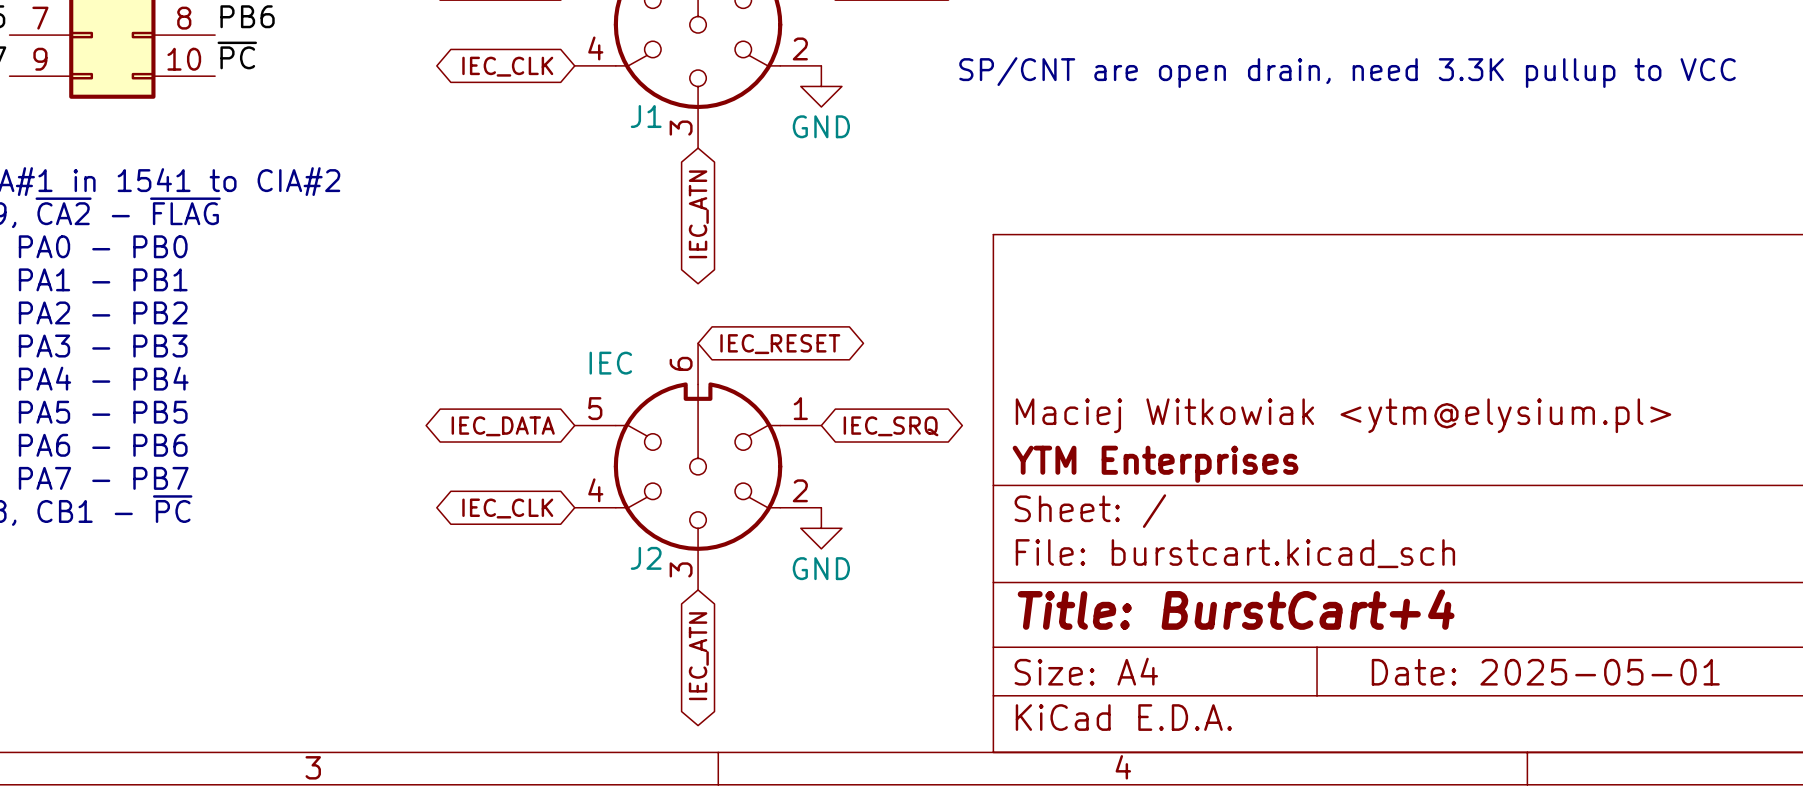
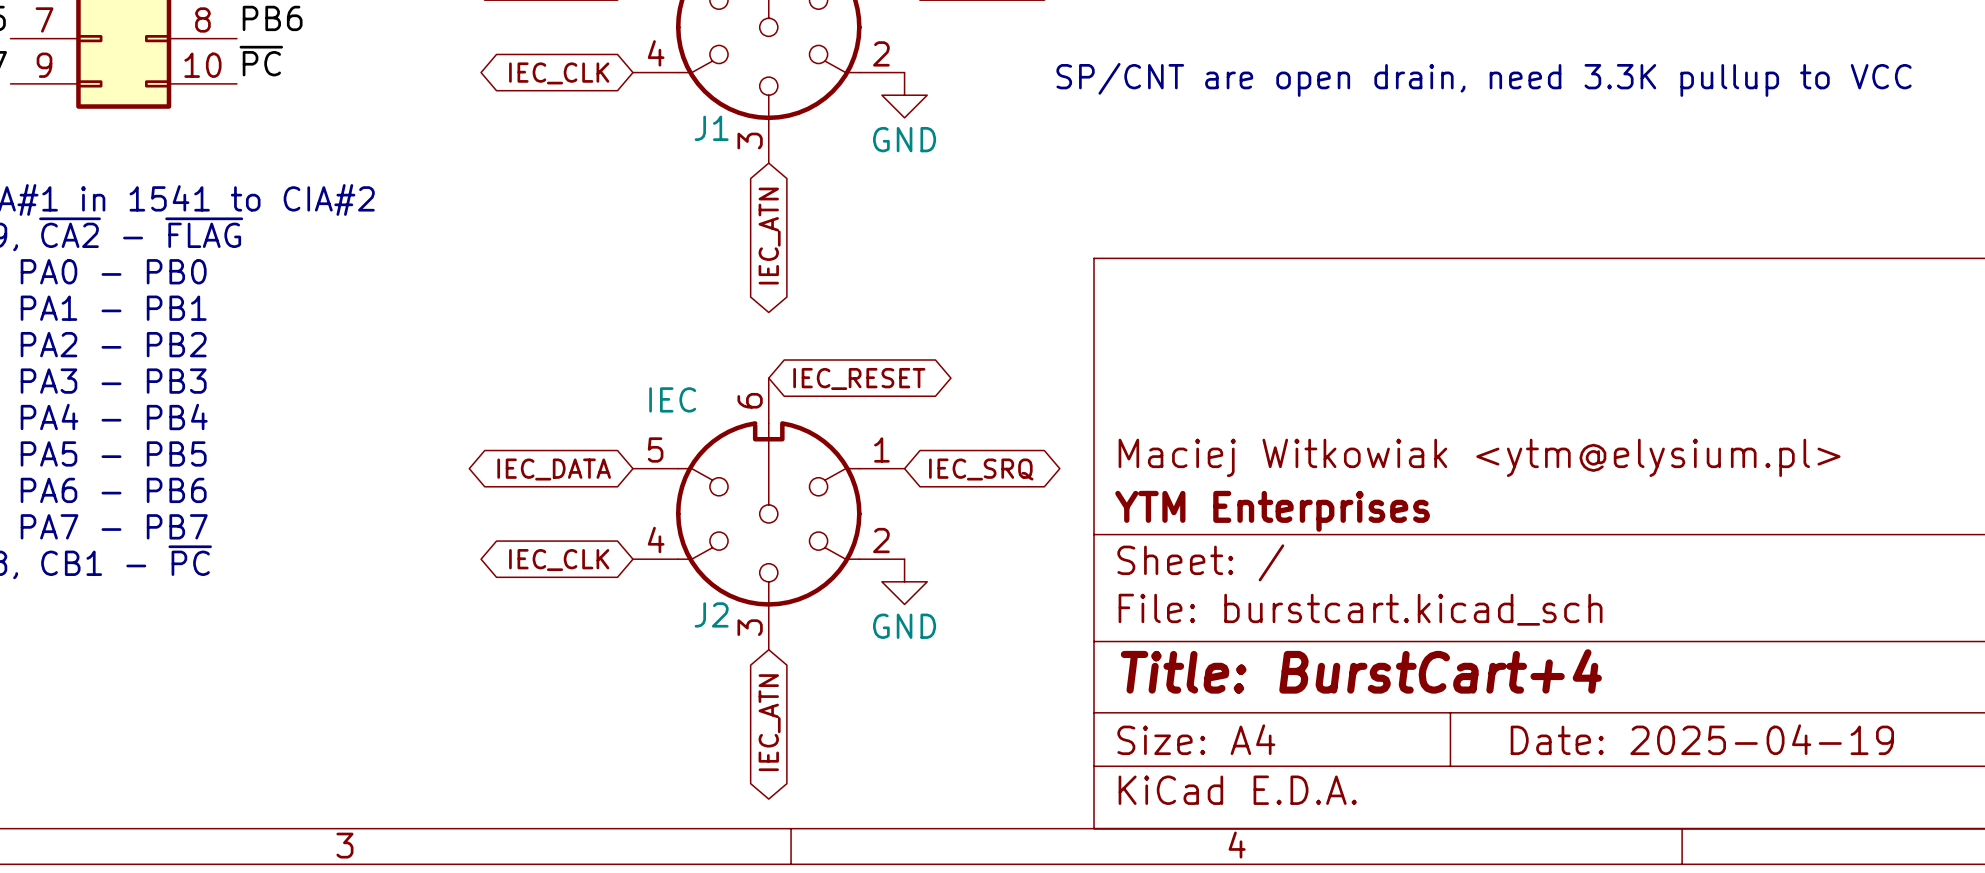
title block: Date: 2025-05-01 (1545, 672) -> Date: 2025-04-19 (1702, 739)

